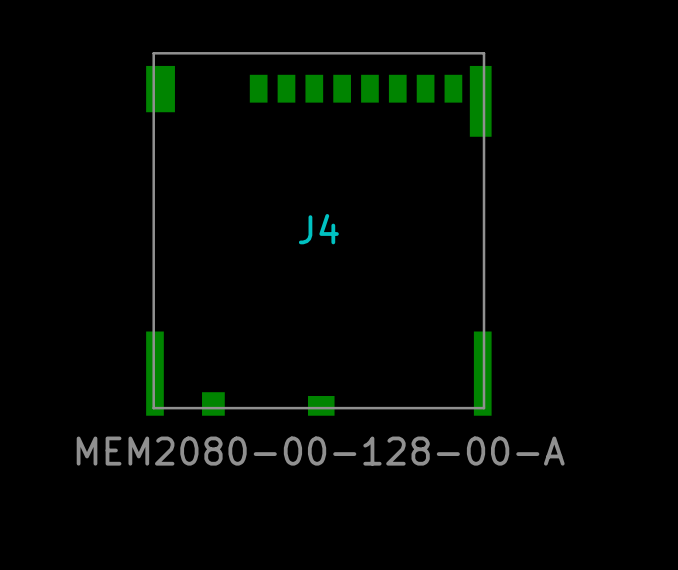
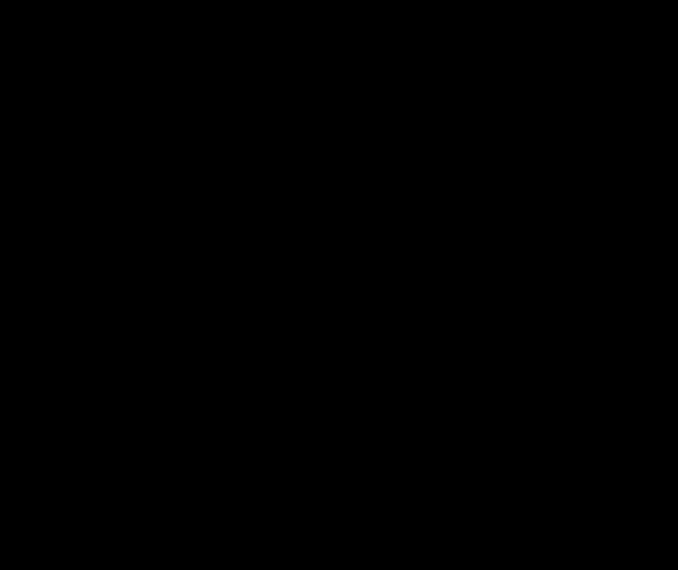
J4: MEM2080-00-128-00-A (318, 233) -> none

